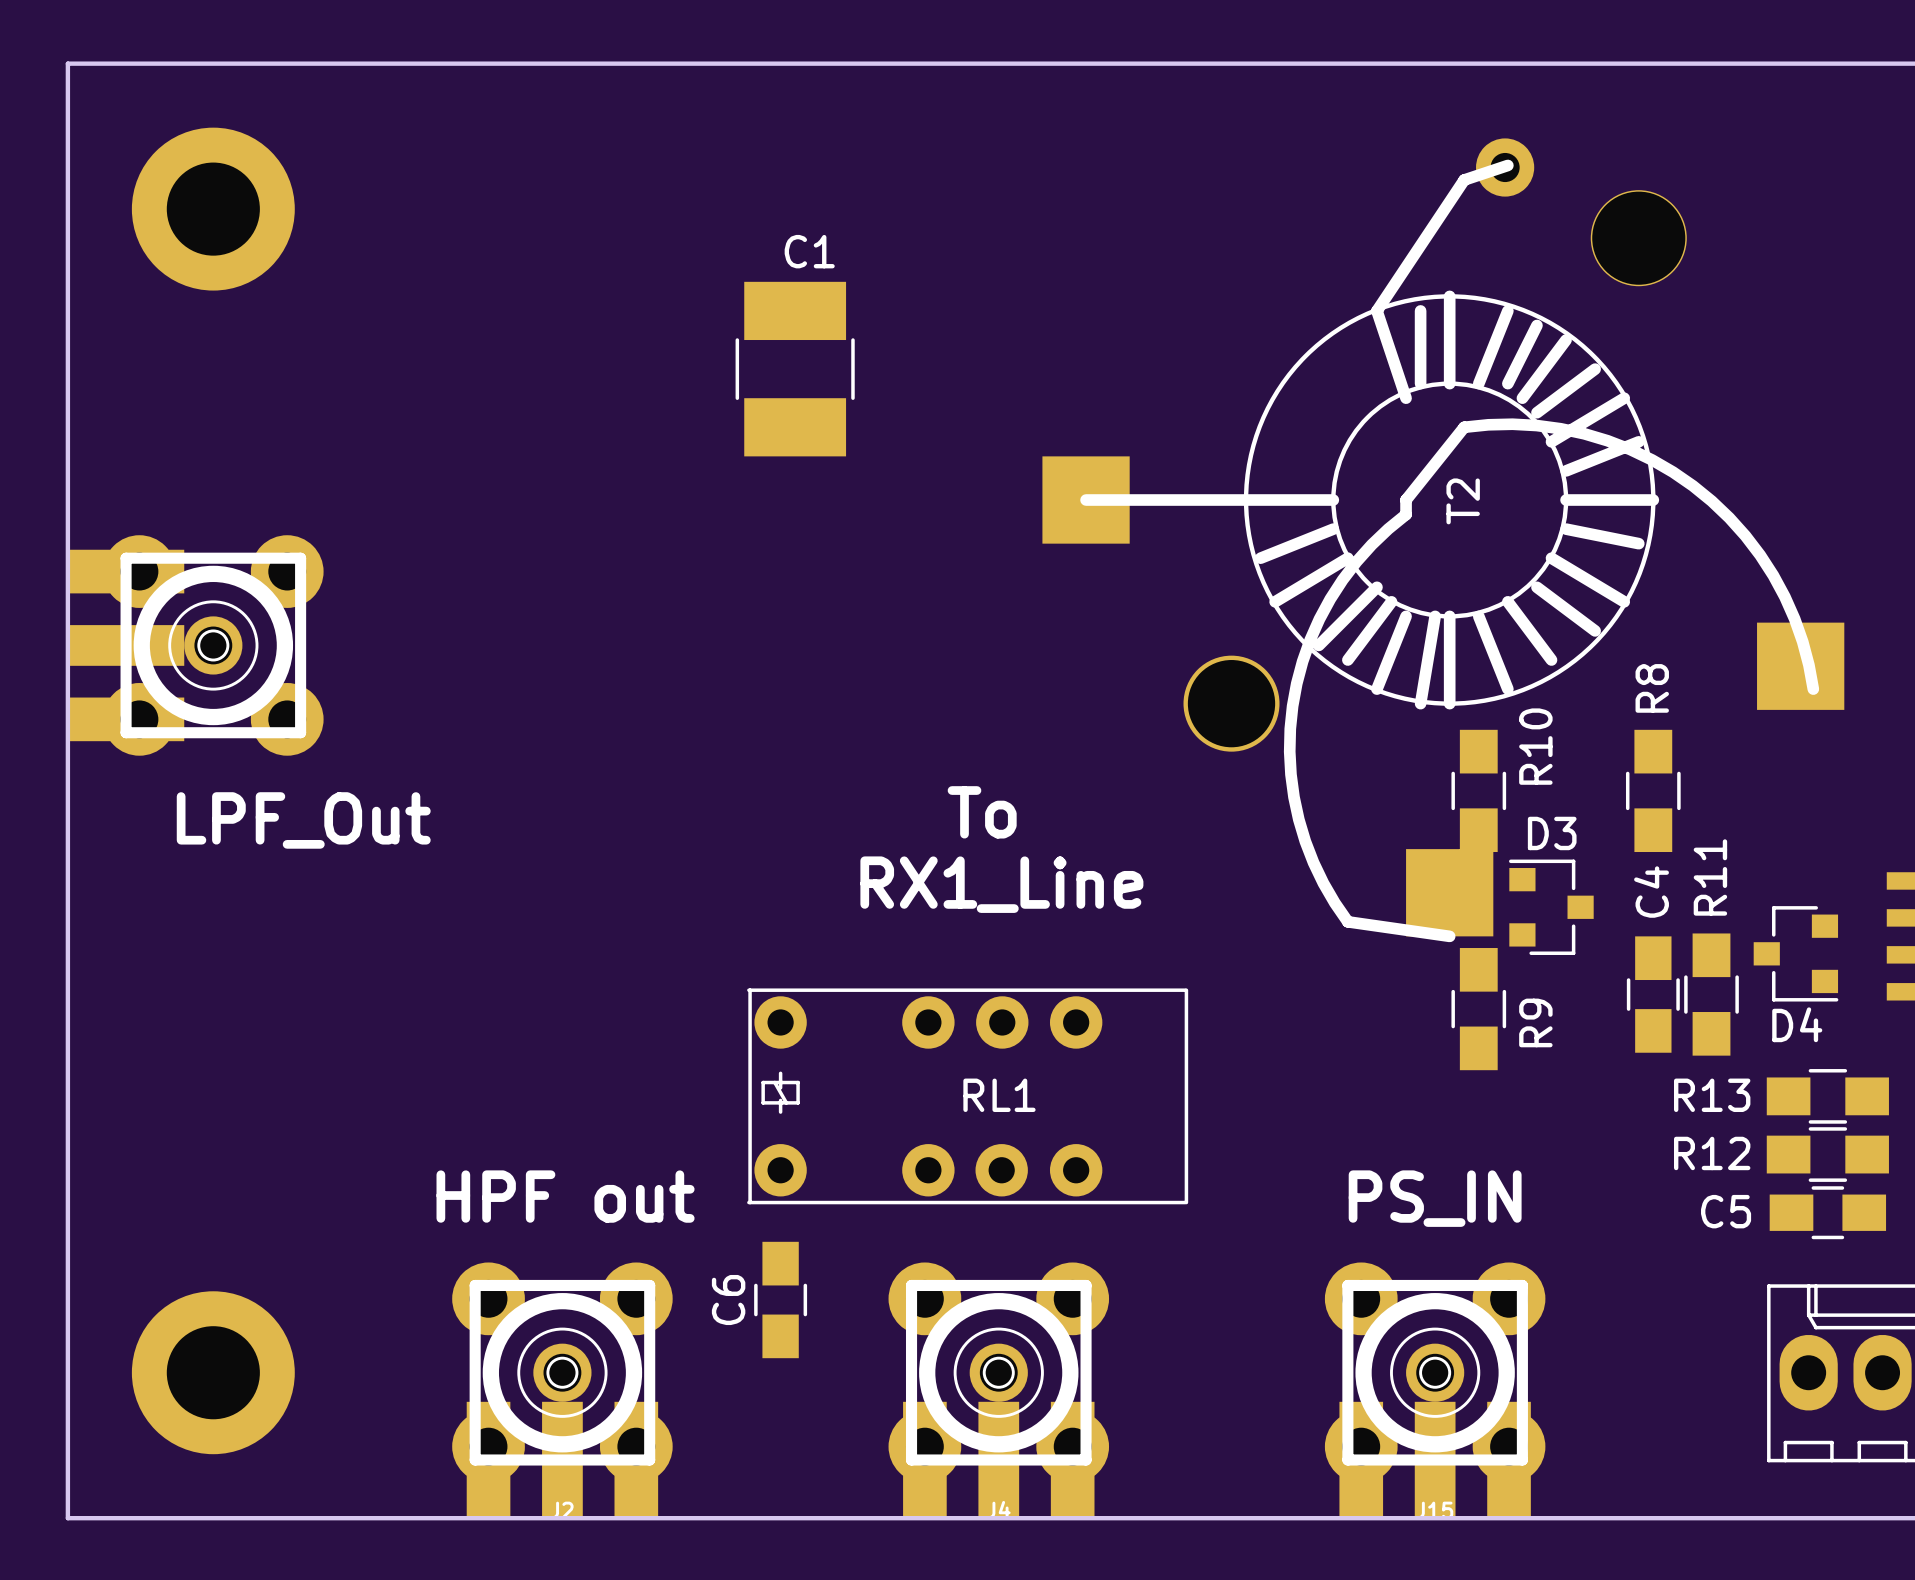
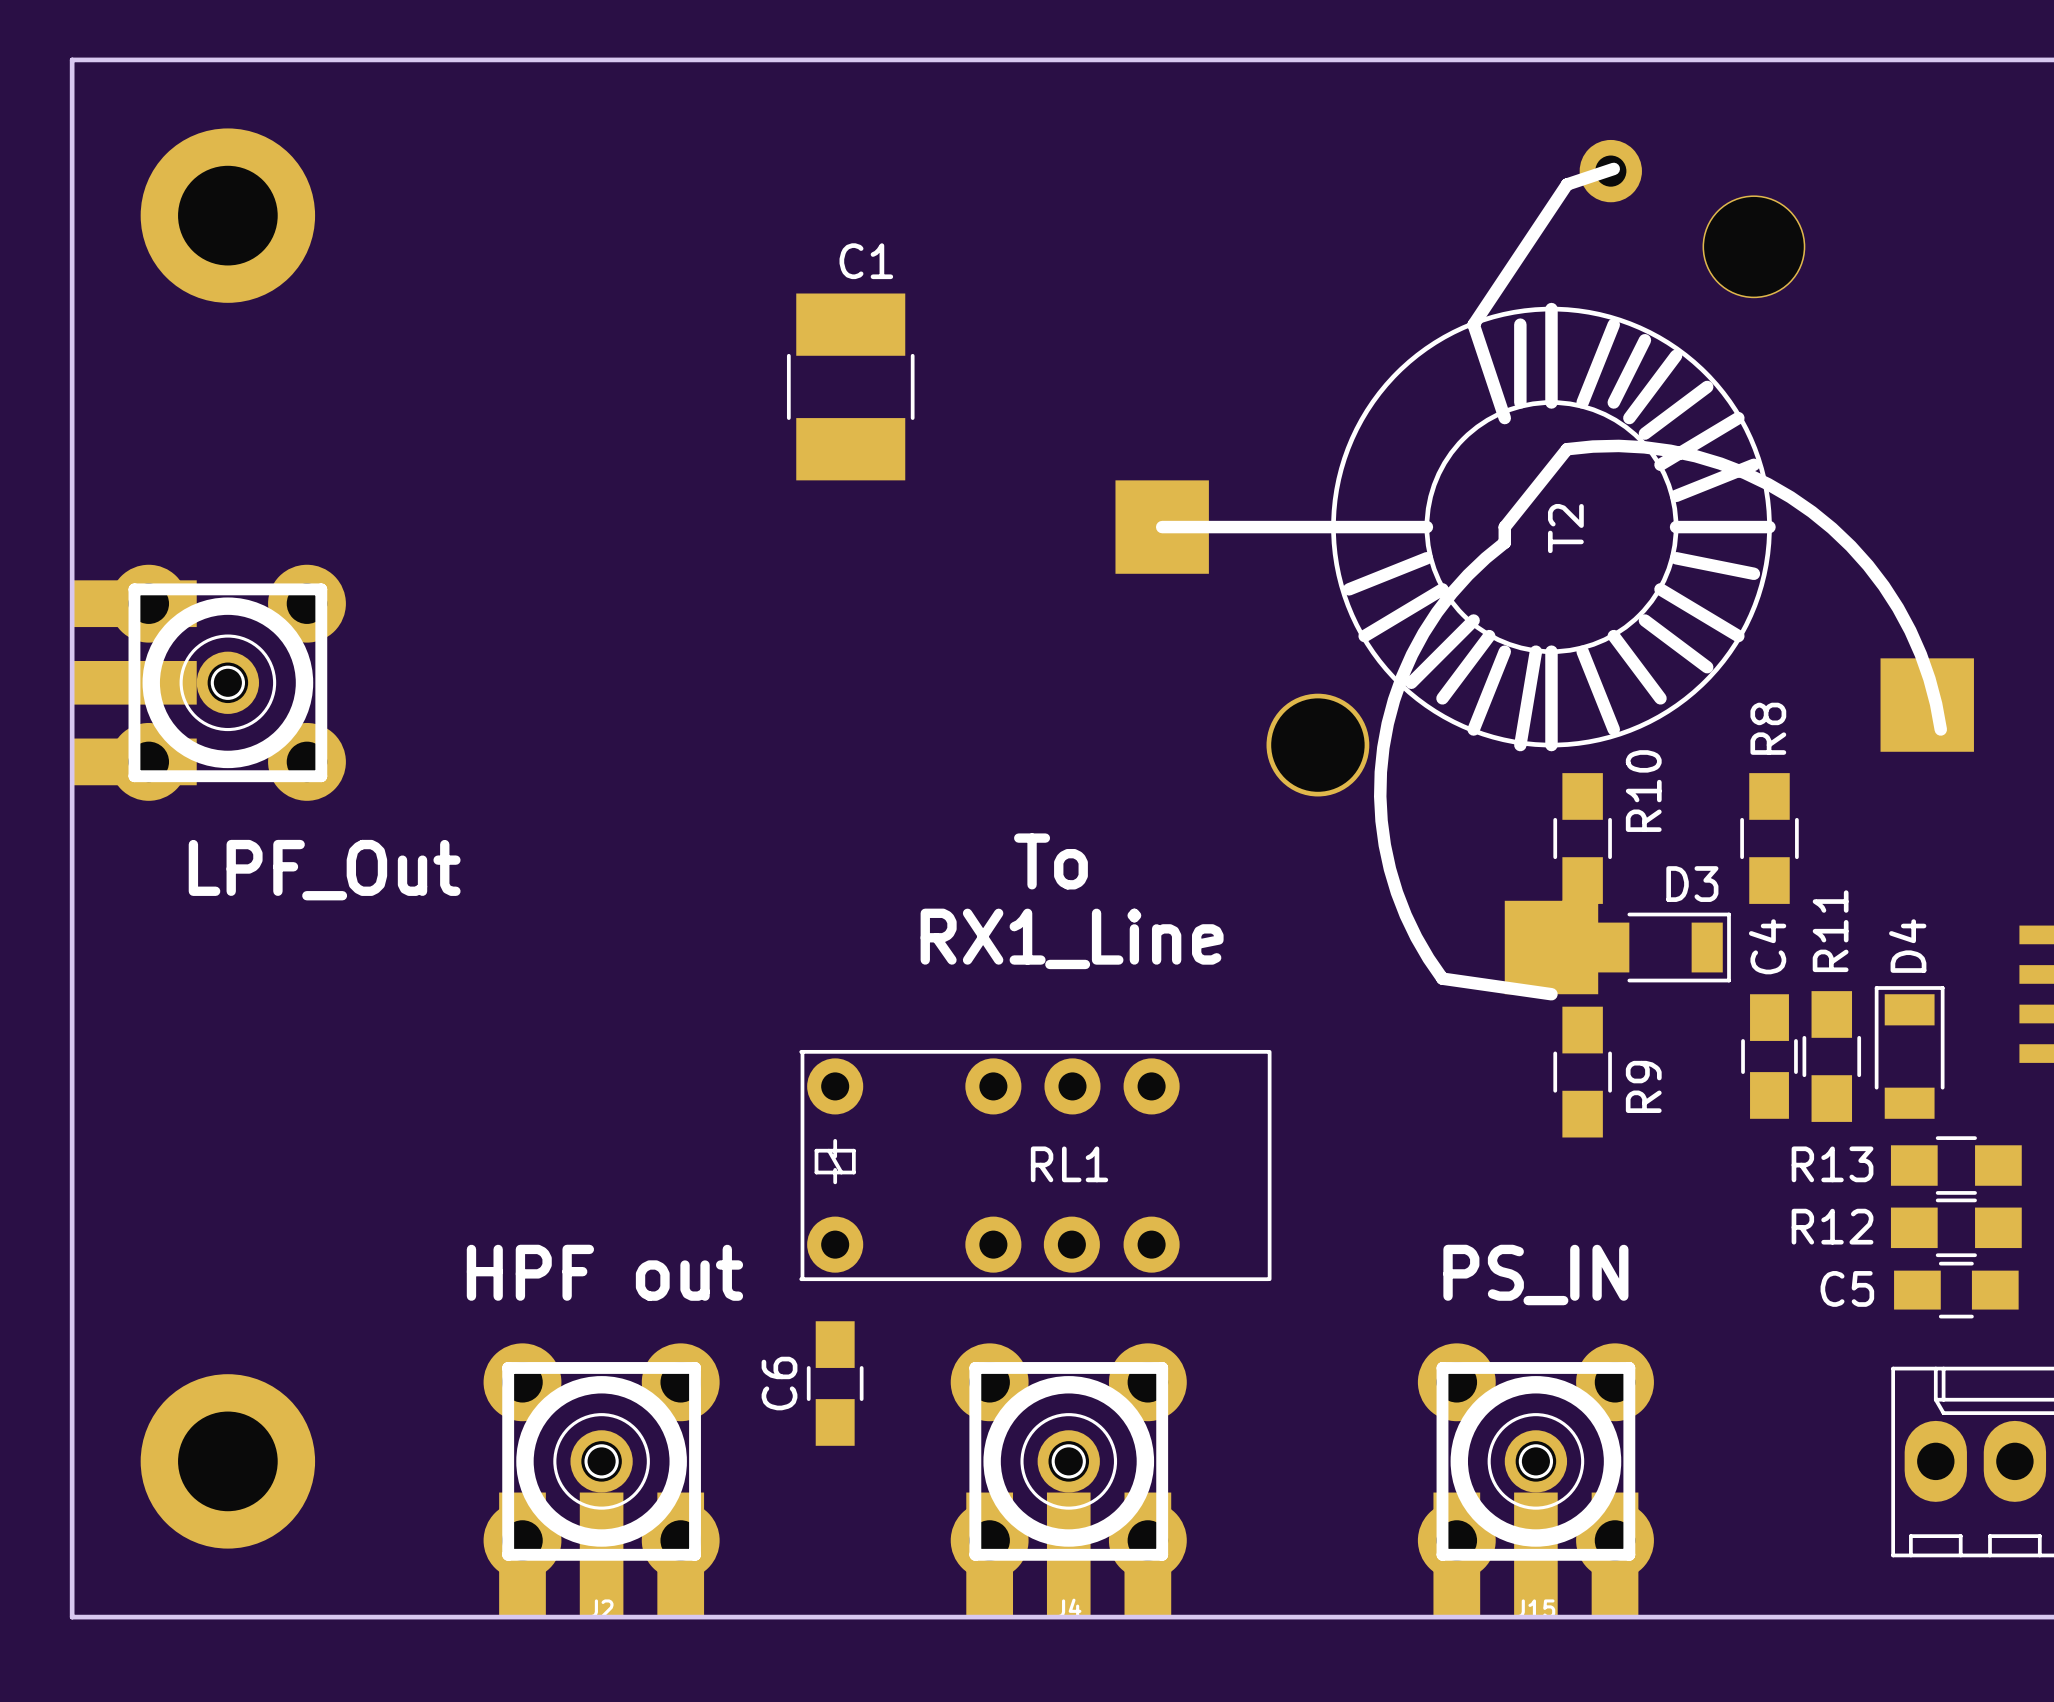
D3 footprint: [1509, 859, 1594, 955] -> [1598, 912, 1731, 983]
D4 footprint: [1753, 906, 1839, 1002] -> [1874, 986, 1945, 1119]
D4 name position: D4 (1797, 1024) -> D4 (1907, 946)

